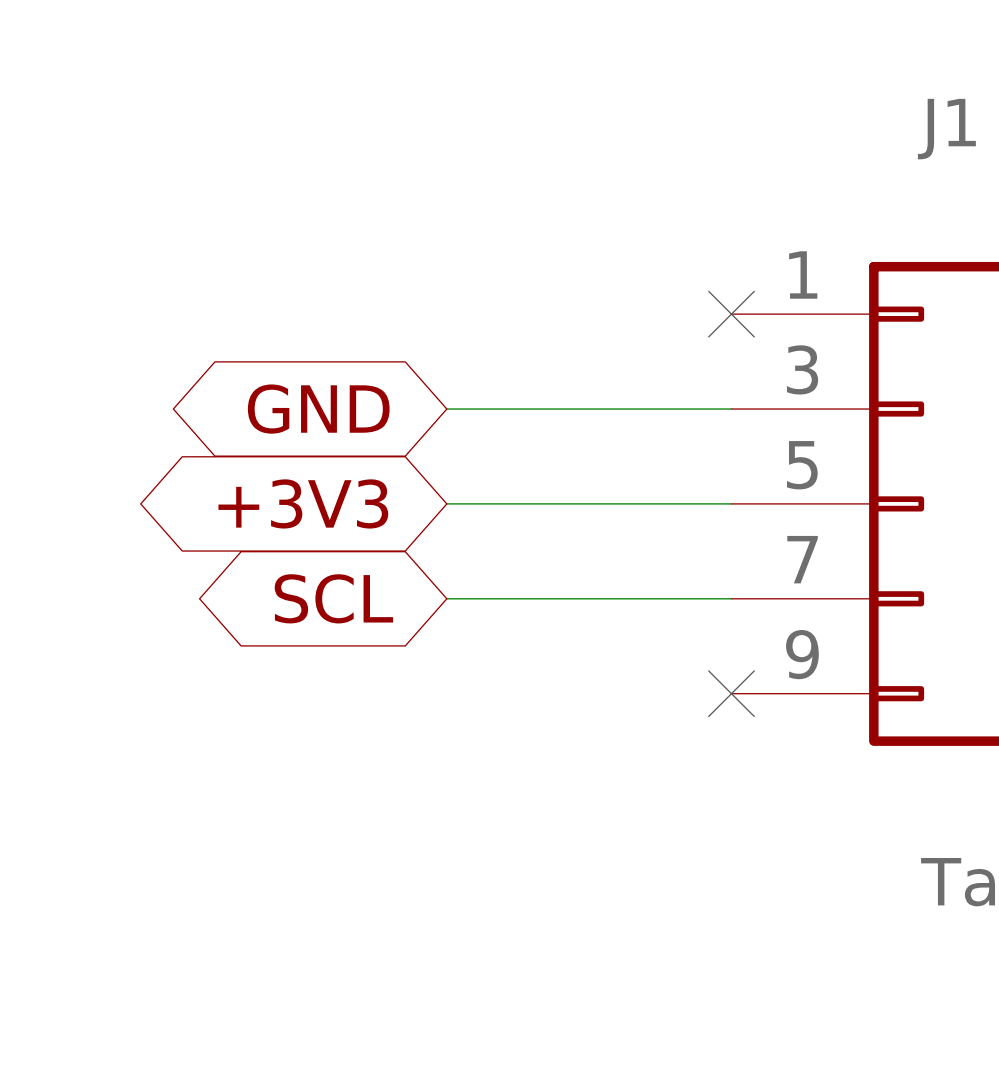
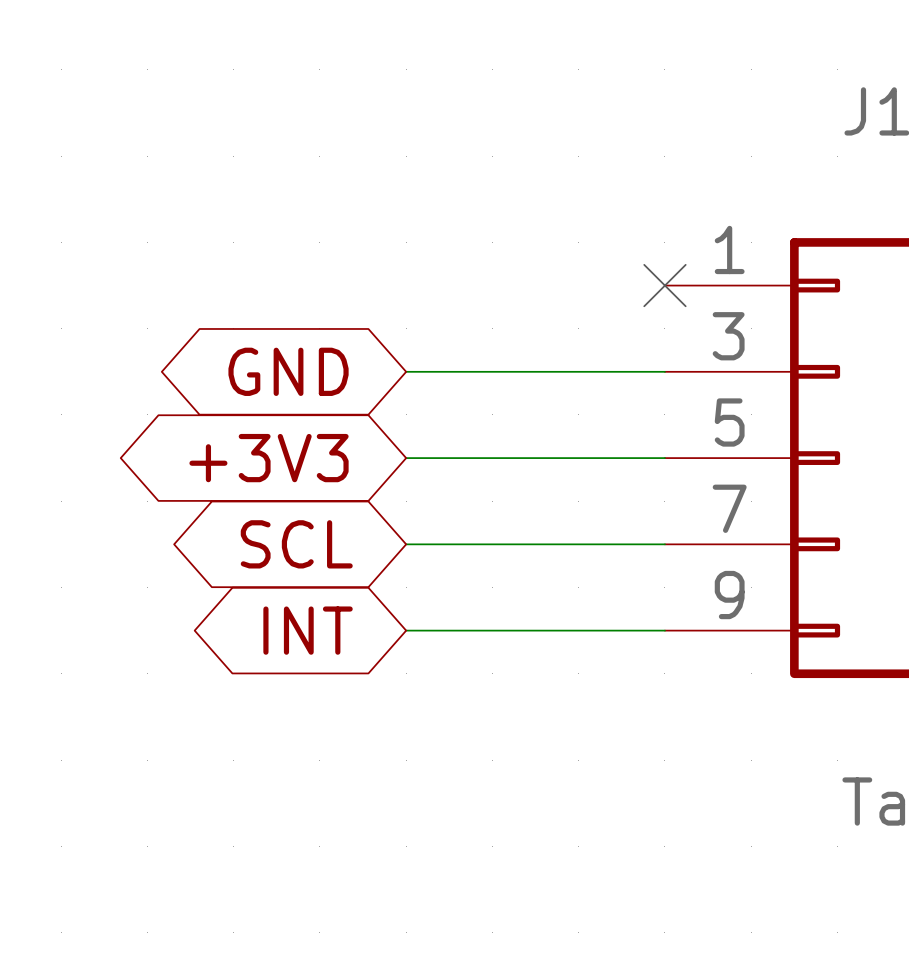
global label: none -> INT (308, 630)
wire: none -> (406, 630) (664, 630)
no-connect mark: (731, 693) -> none

